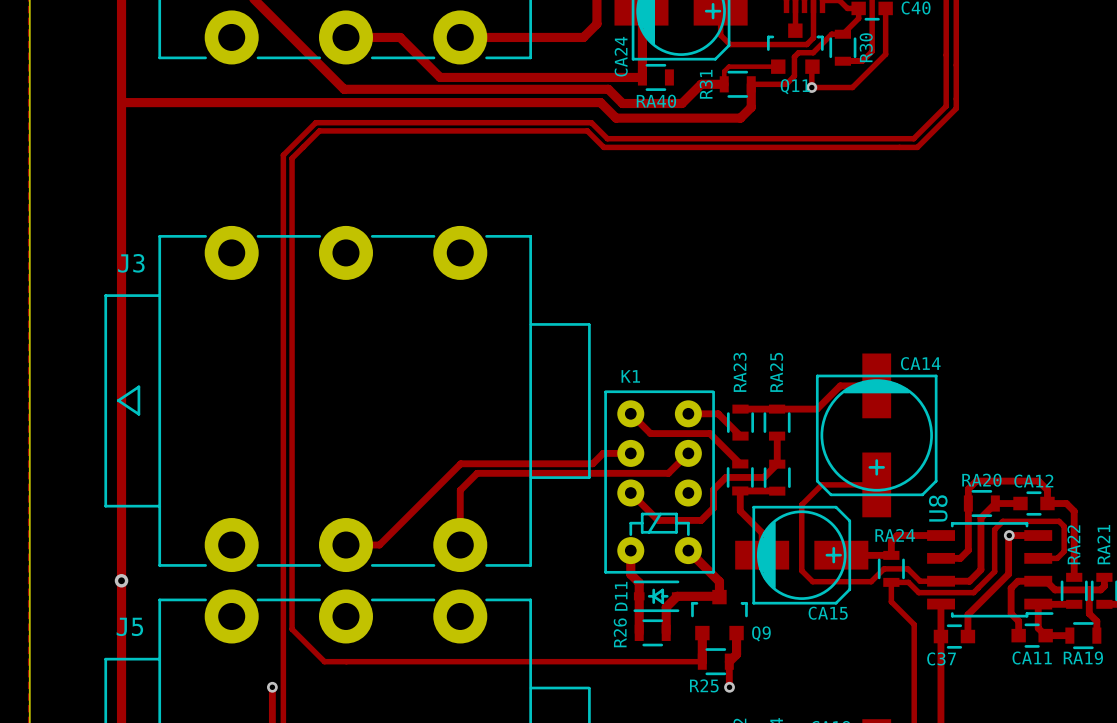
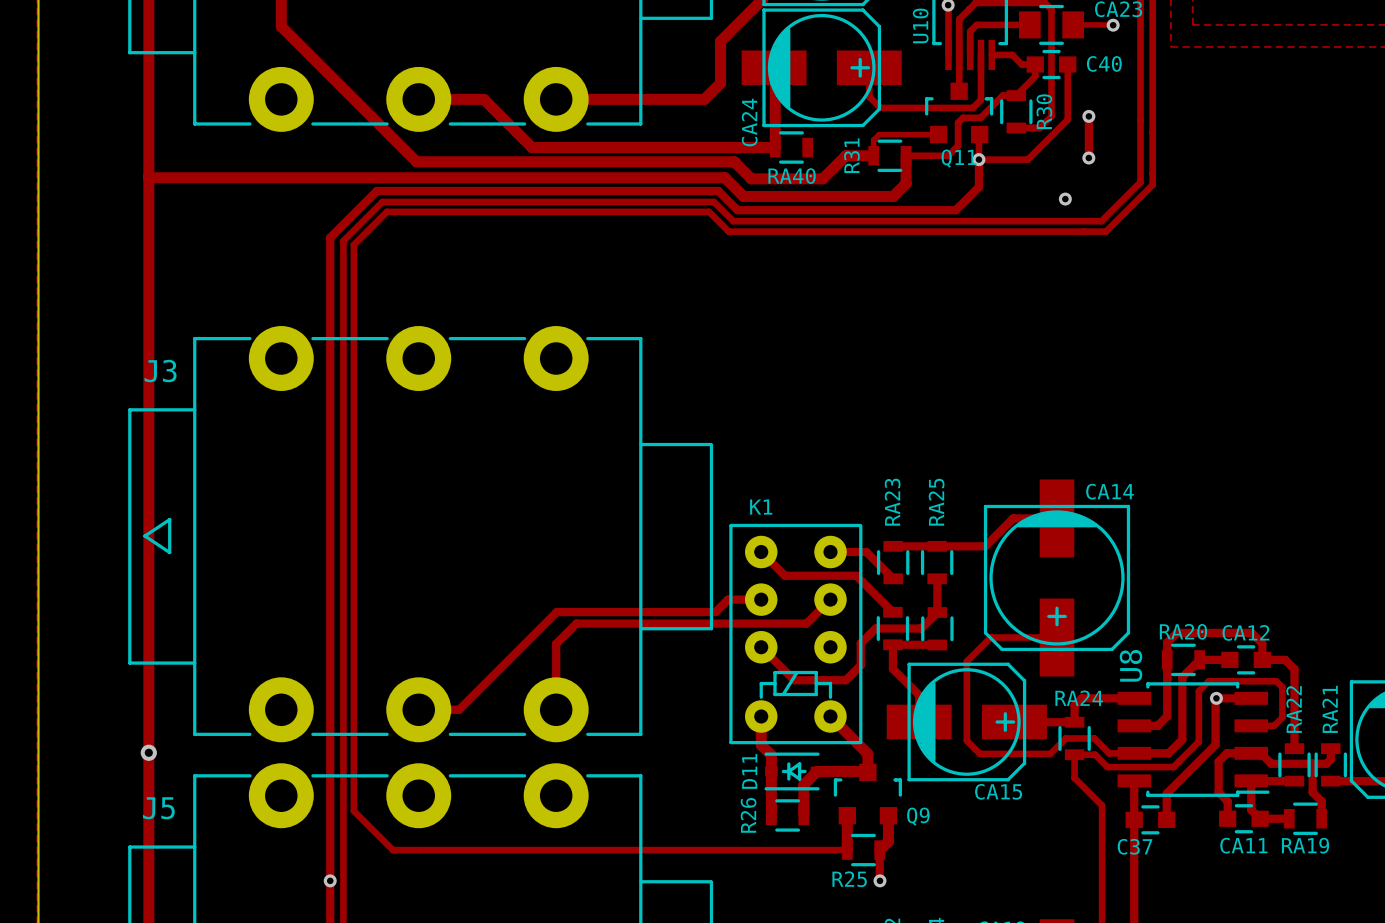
track: none -> (1088, 116) (1088, 157)
via: none -> (1088, 116)
via: none -> (1088, 158)
track: none -> (978, 159) (978, 187) (955, 210) (737, 210) (718, 190) (376, 190) (330, 237) (330, 880)
via: none -> (1065, 199)

